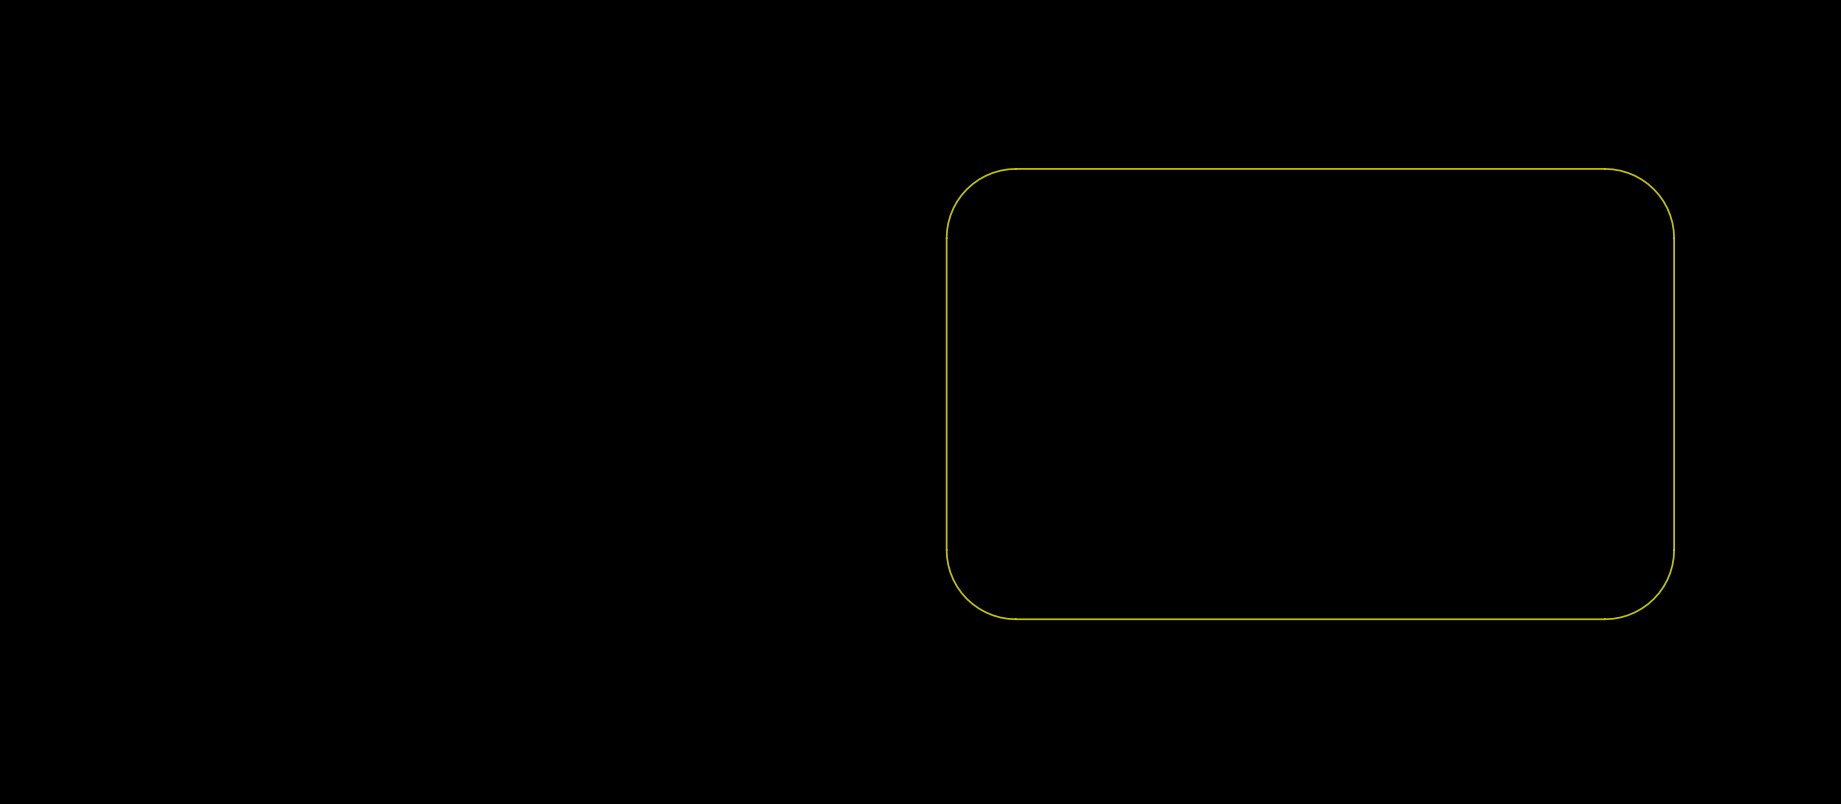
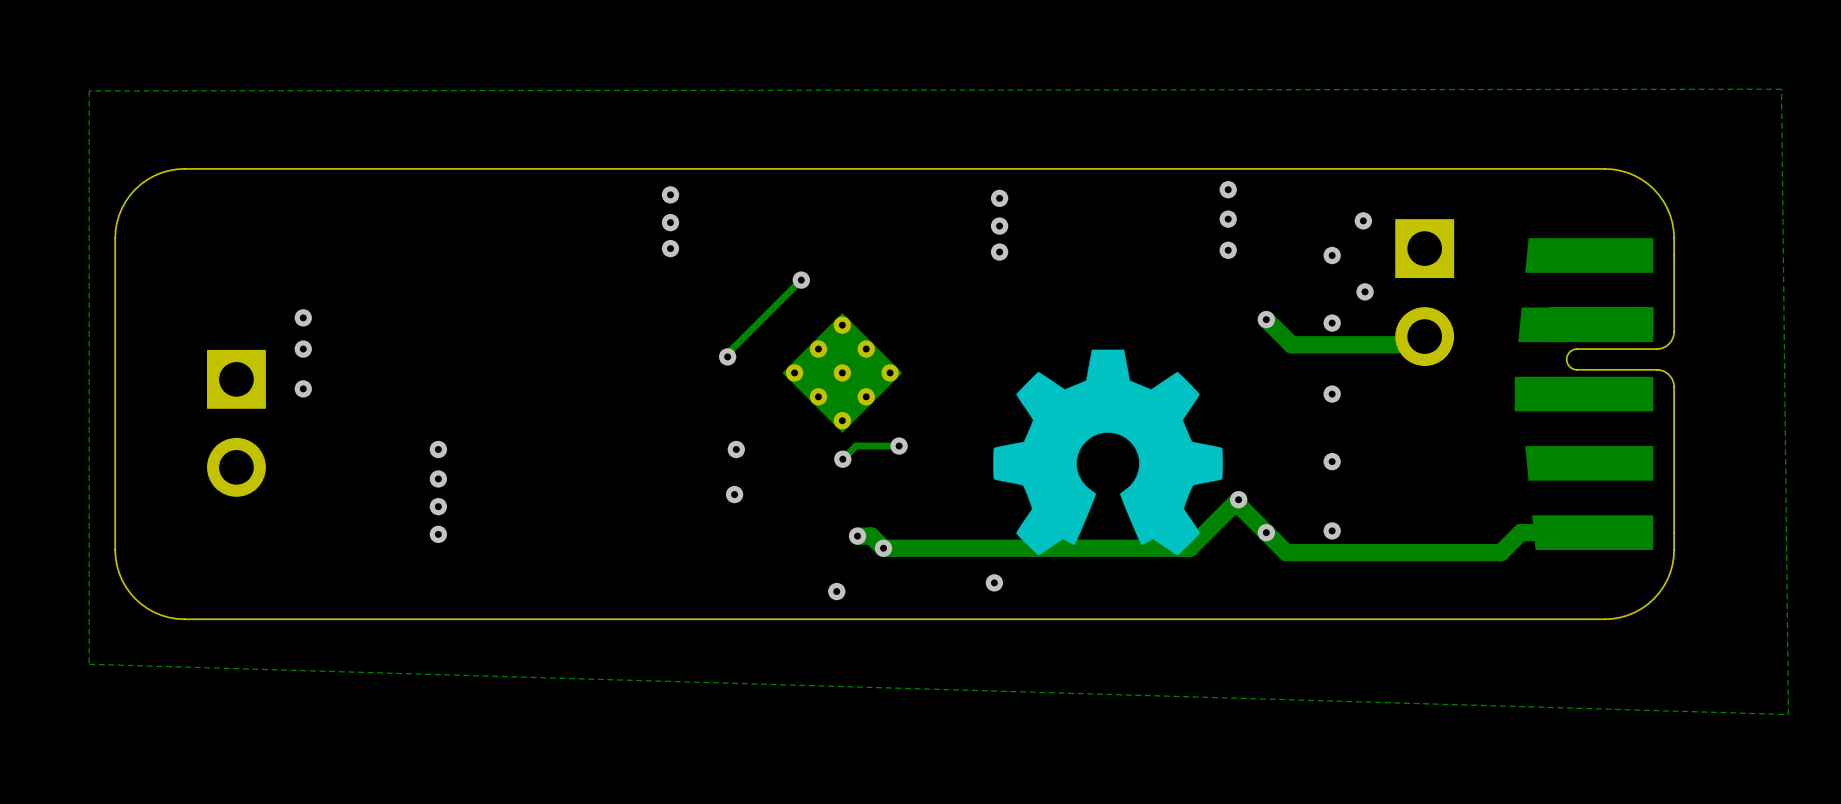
zone outline: none -> (1781, 89) (89, 90) (89, 664) (1788, 714) (1781, 89)
board edge: (1015, 168) (993, 172) (979, 179) (966, 189) (953, 208) (948, 222) (946, 238) (946, 549) (948, 565) (957, 586) (972, 604) (993, 615) (1015, 619) -> (1015, 168) (176, 169) (154, 175) (135, 189) (122, 208) (116, 222) (115, 238) (115, 557) (119, 572) (125, 586) (135, 598) (154, 612) (169, 617) (184, 619) (1015, 619)
via: none -> (1228, 189)
via: none -> (670, 194)
via: none -> (999, 198)
via: none -> (1228, 219)
via: none -> (1363, 220)
via: none -> (670, 222)
via: none -> (999, 226)
via: none -> (670, 248)
via: none -> (1228, 250)
via: none -> (999, 252)
via: none -> (1332, 255)
board edge: (1674, 255) (1674, 532) -> none
track: none -> (801, 280) (727, 353) (727, 356)
via: none -> (801, 280)
via: none -> (1365, 291)
part: none -> (1424, 292)
via: none -> (303, 317)
track: none -> (1266, 319) (1291, 344) (1416, 344) (1424, 336)
via: none -> (1266, 319)
via: none -> (1332, 323)
via: none -> (303, 349)
drawing: none -> [993, 349, 1223, 556]
via: none -> (727, 356)
part: none -> (842, 372)
via: none -> (303, 388)
via: none -> (1332, 394)
part: none -> (1594, 394)
part: none -> (236, 423)
track: none -> (899, 446) (855, 446) (842, 459)
via: none -> (899, 446)
via: none -> (438, 449)
via: none -> (736, 449)
via: none -> (842, 459)
via: none -> (1332, 461)
via: none -> (438, 478)
via: none -> (734, 494)
via: none -> (1238, 499)
via: none -> (438, 506)
via: none -> (1332, 530)
via: none -> (1266, 532)
track: none -> (1594, 532) (1520, 532) (1500, 552) (1286, 552) (1238, 504) (1238, 499) (1190, 548) (883, 548) (871, 536) (857, 536)
via: none -> (438, 534)
via: none -> (857, 536)
via: none -> (883, 548)
via: none -> (994, 582)
via: none -> (836, 591)

